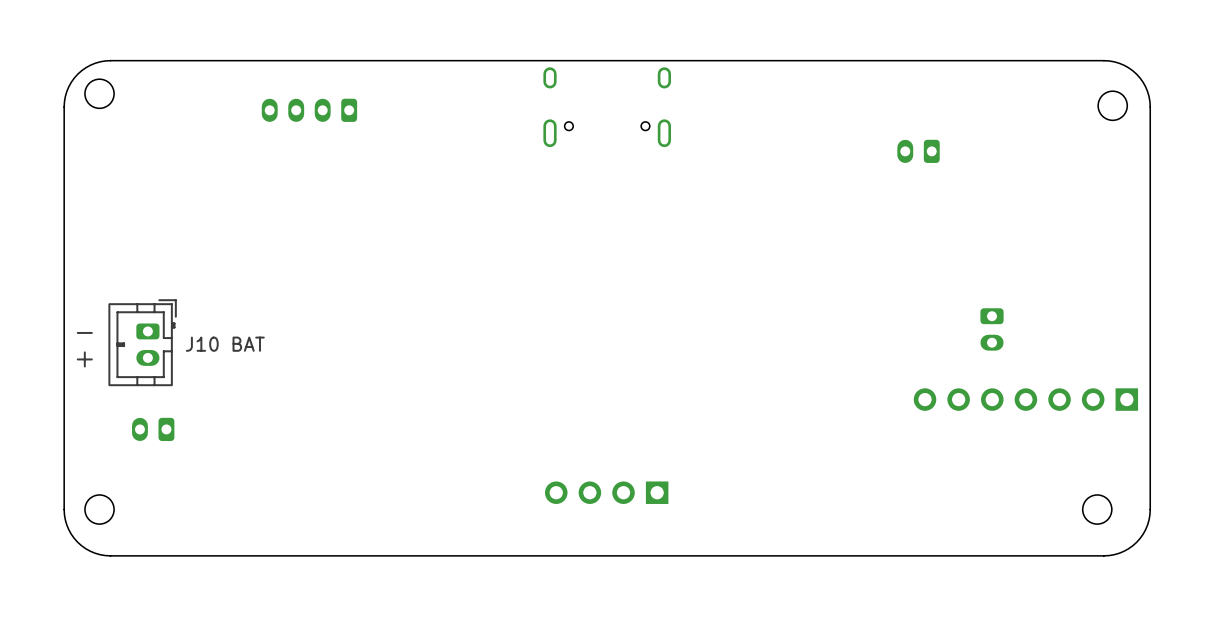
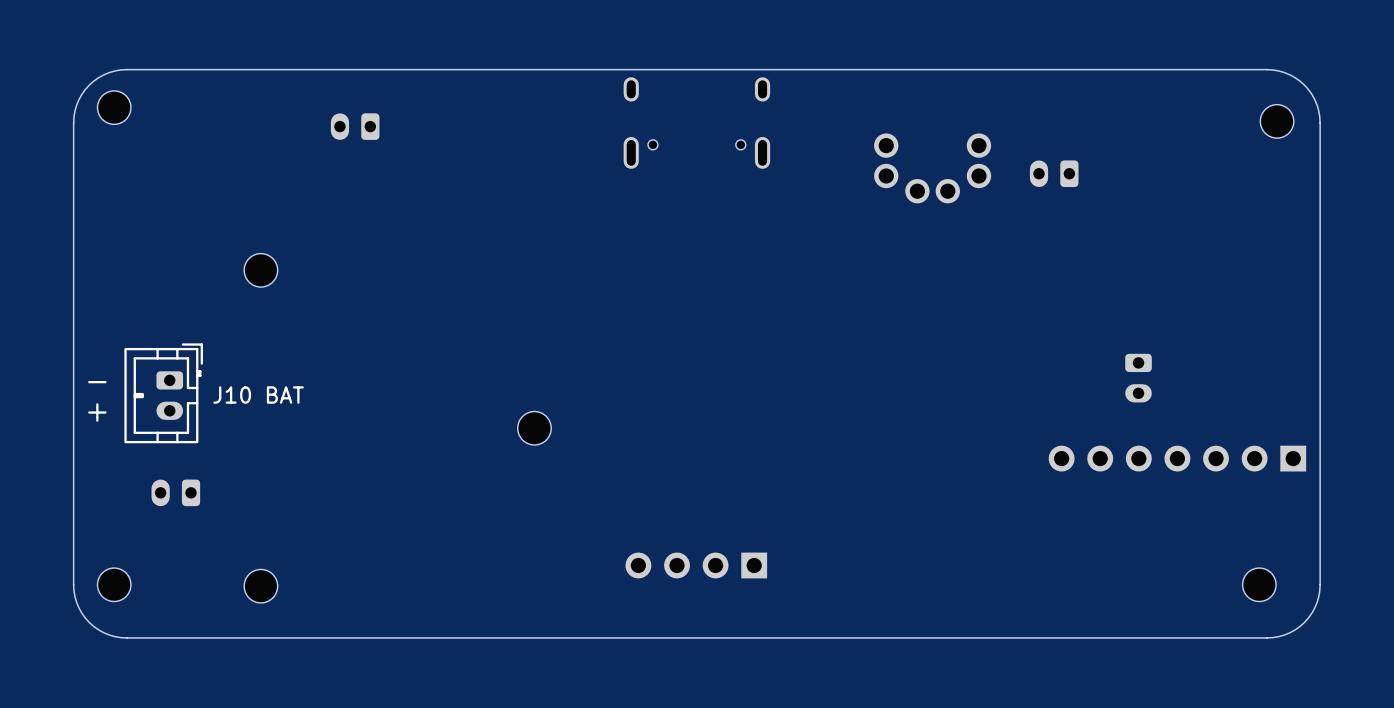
part footprint: [261, 98, 358, 122] -> [330, 113, 380, 140]
part: none -> (932, 168)
part: none -> (260, 270)
part: none -> (534, 428)
part: none -> (260, 586)

